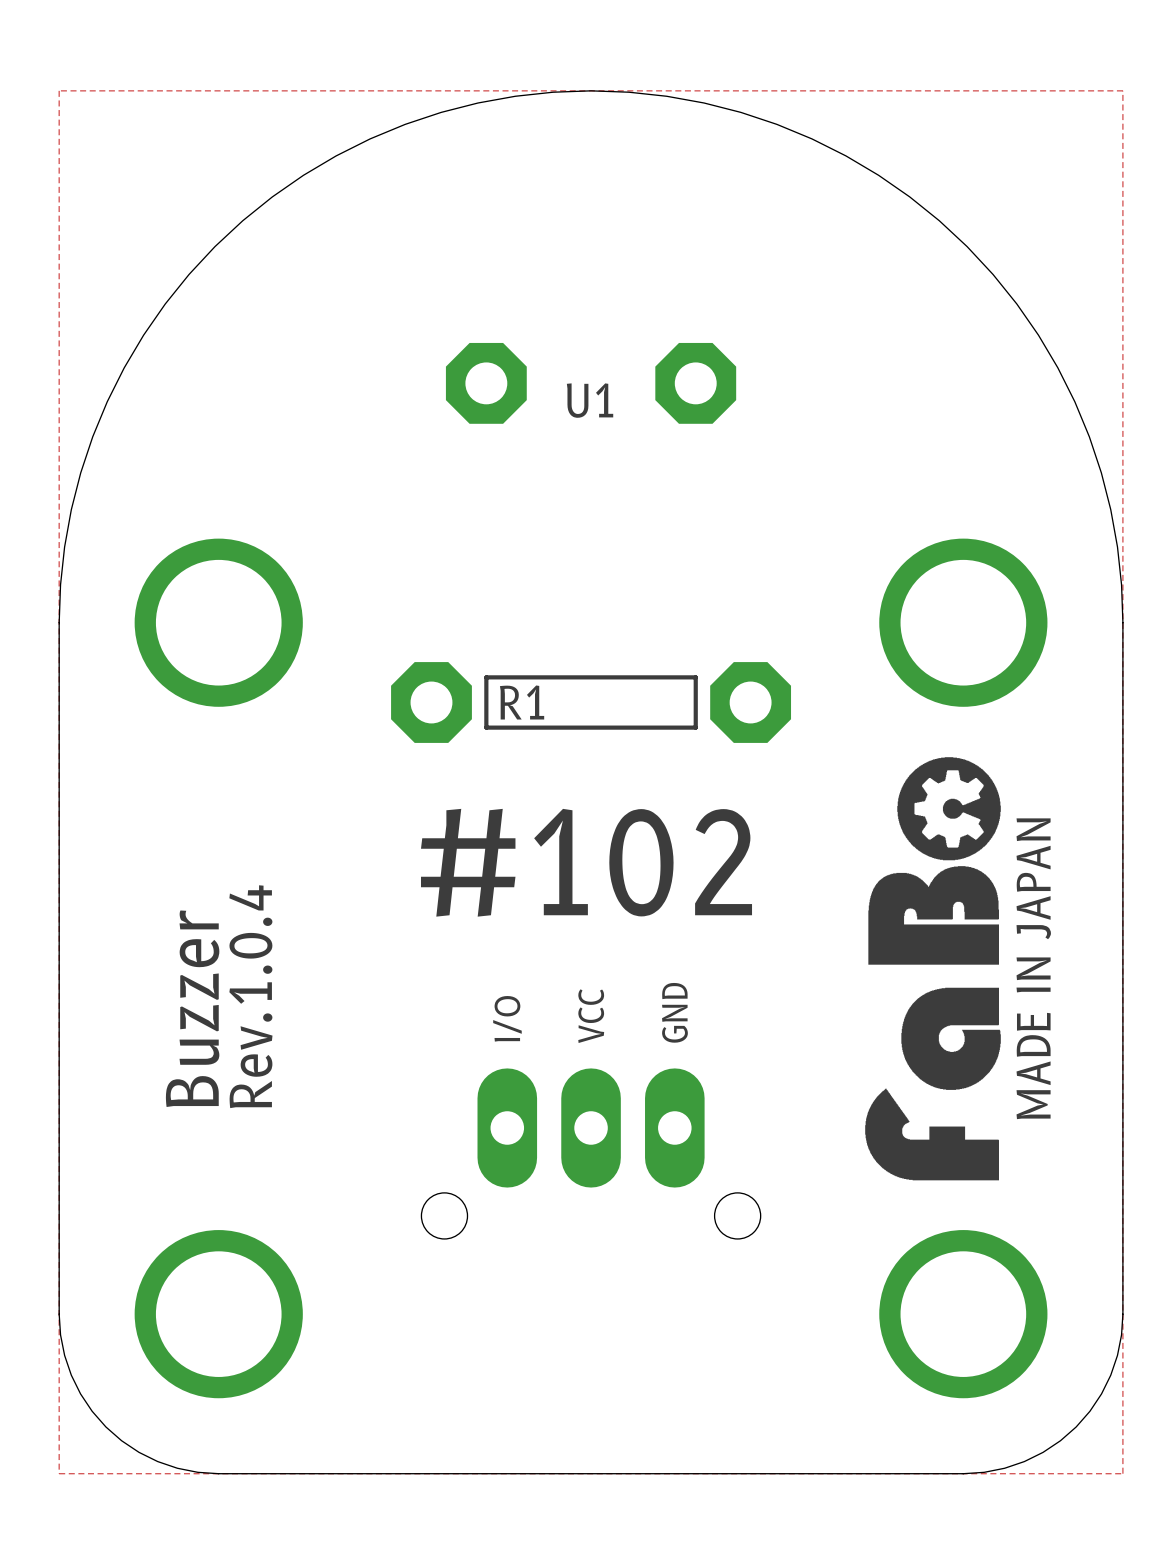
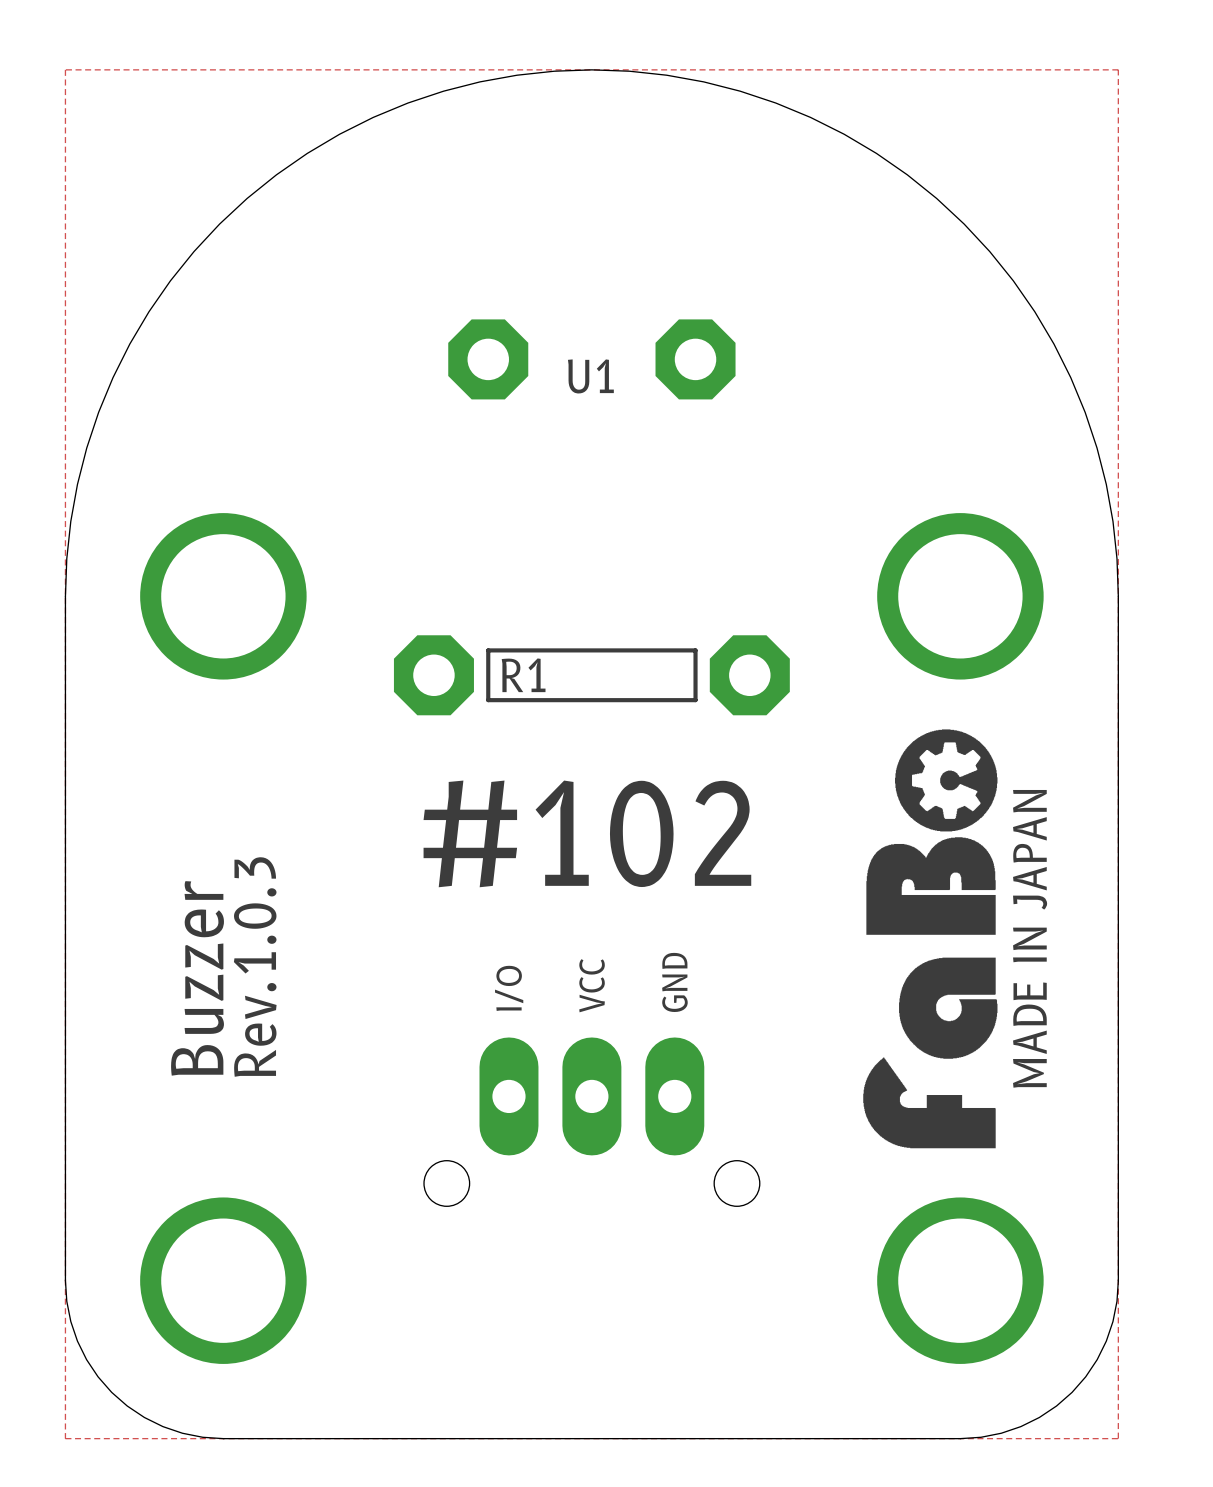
text: Rev.1.0.4 (250, 996) -> Rev.1.0.3 (255, 967)

